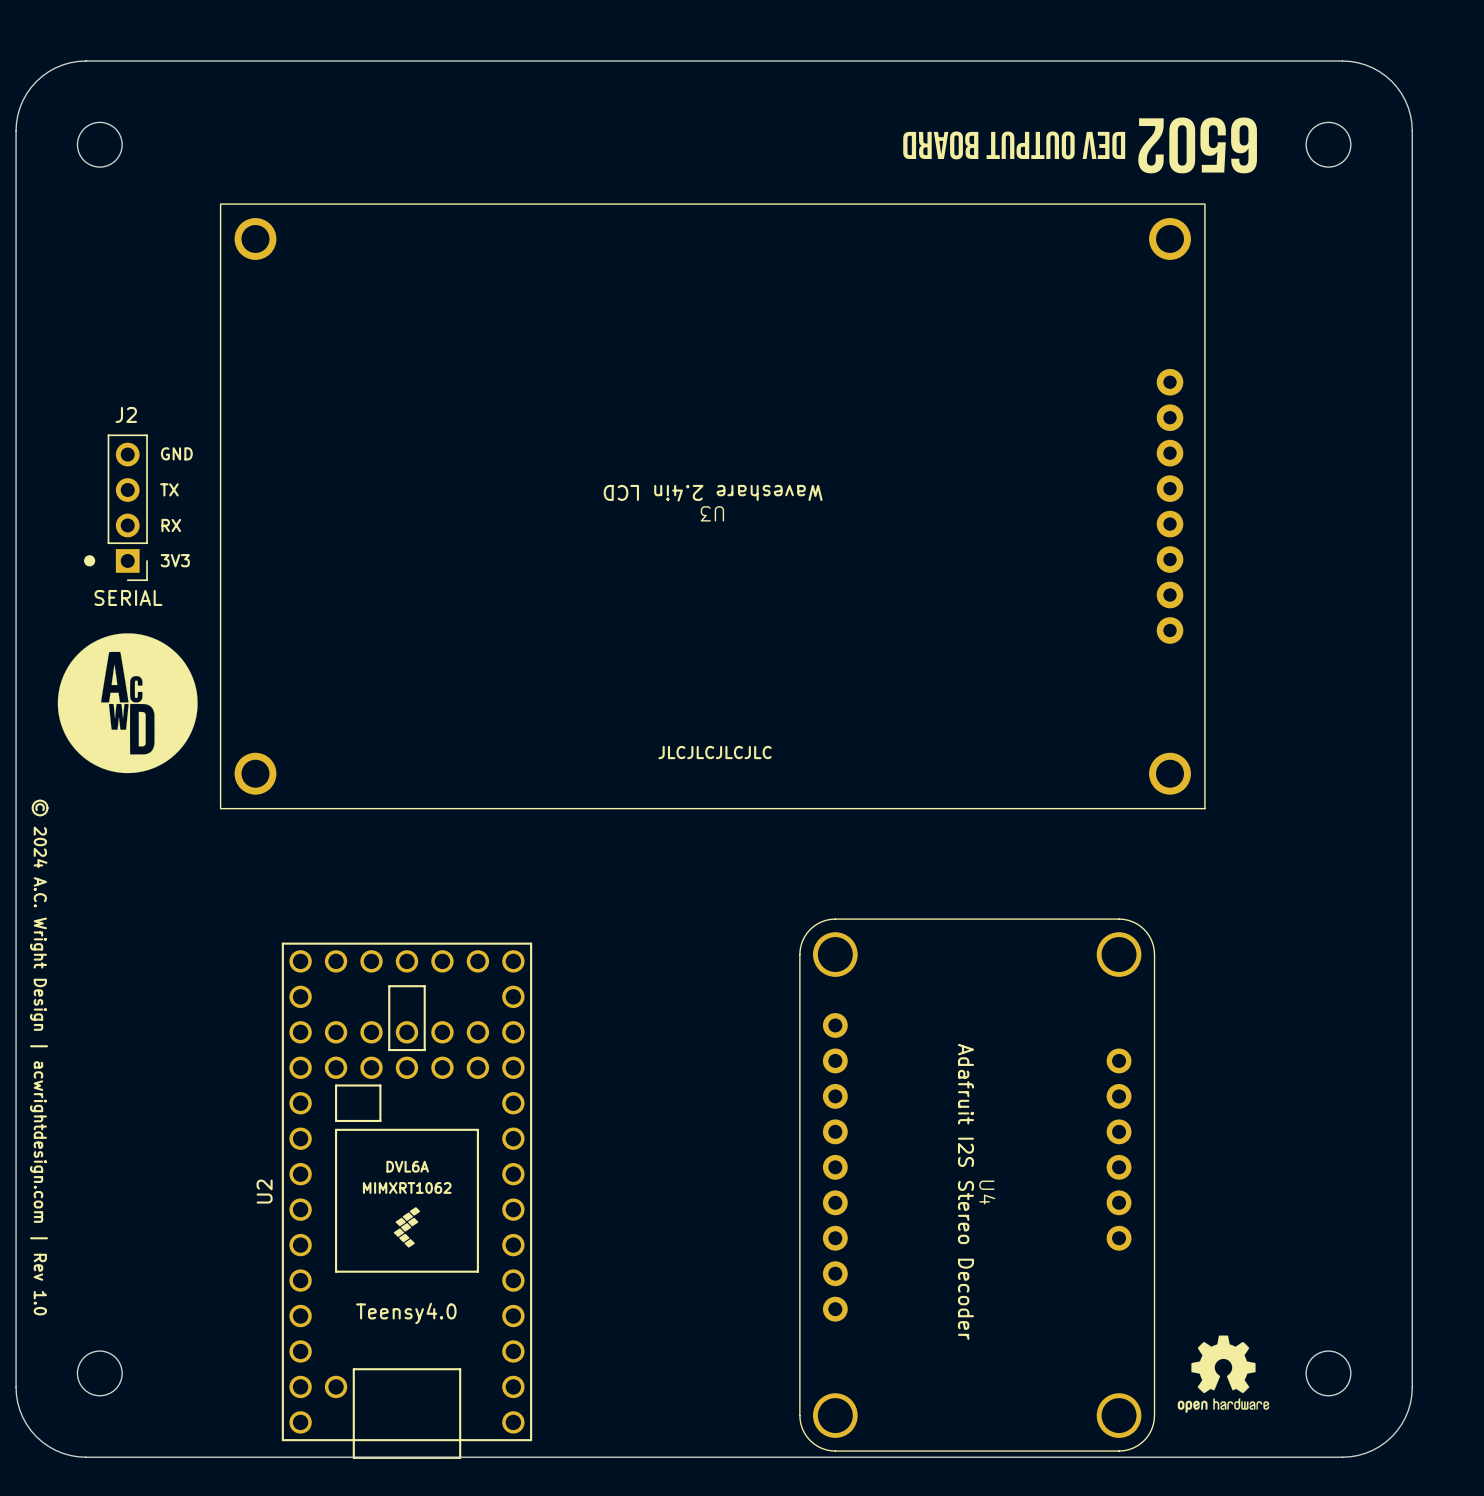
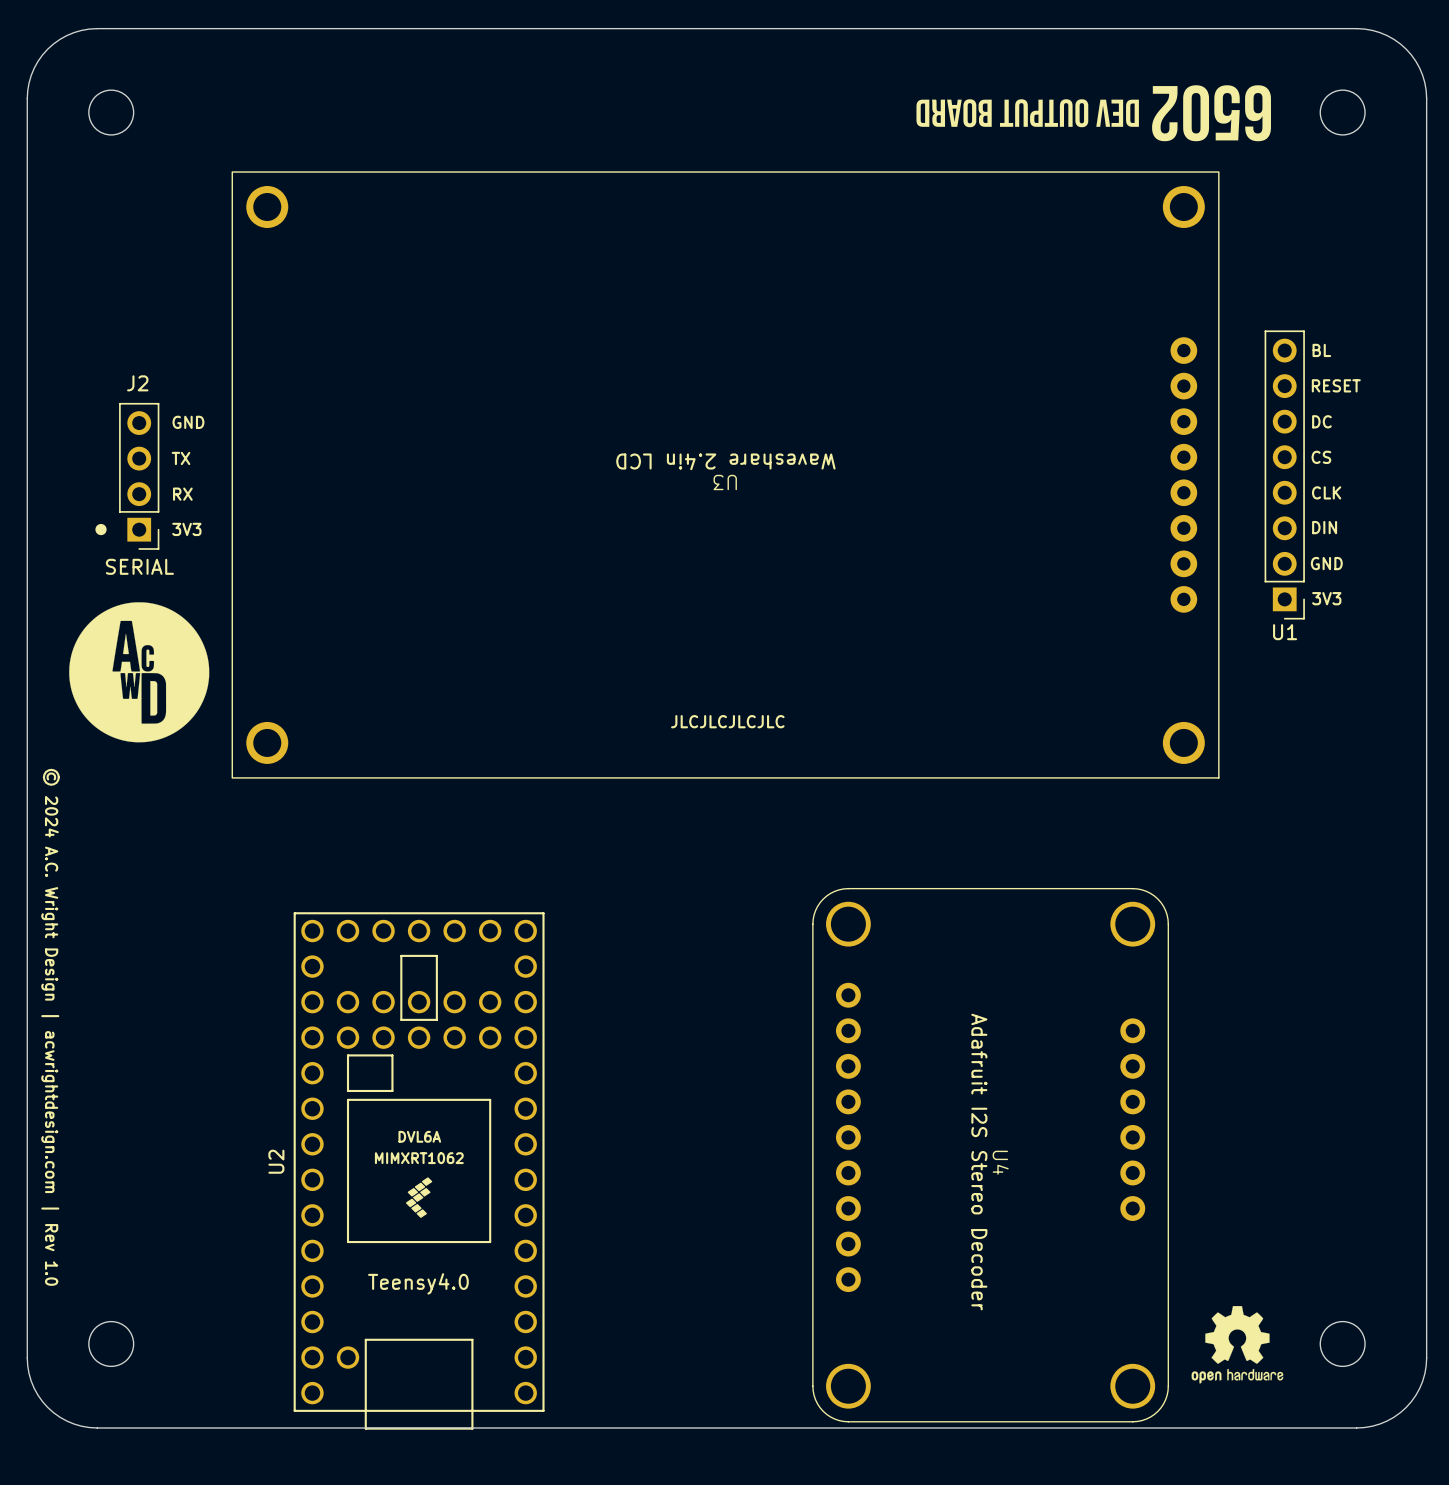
text: none -> BL (1321, 350)
text: none -> RESET (1336, 385)
text: none -> DC (1321, 421)
text: none -> CS (1321, 457)
U1: none -> (1284, 474)
text: none -> CLK (1326, 492)
text: none -> DIN (1324, 527)
text: none -> GND (1326, 563)
text: none -> 3V3 (1326, 598)

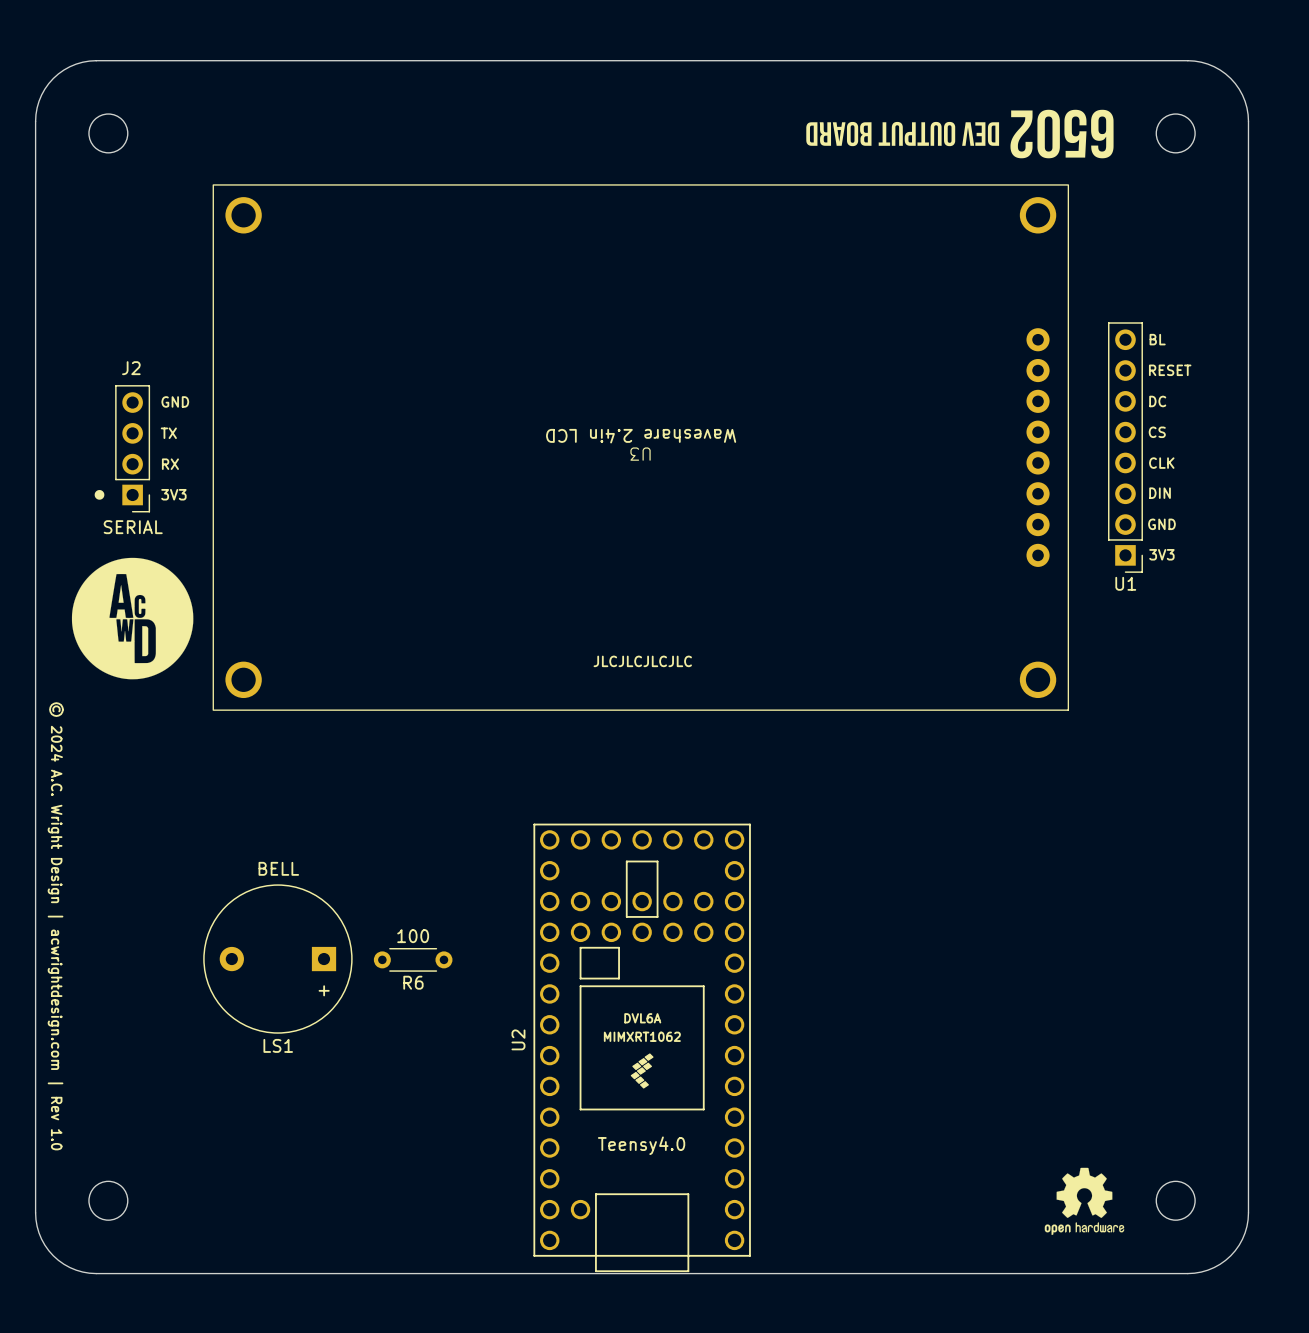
LS1: none -> BELL (277, 959)
R6: none -> 100 (413, 959)
U4: Adafruit I2S Stereo Decoder (990, 1155) -> none
U2 position: (419, 1170) -> (642, 1047)

